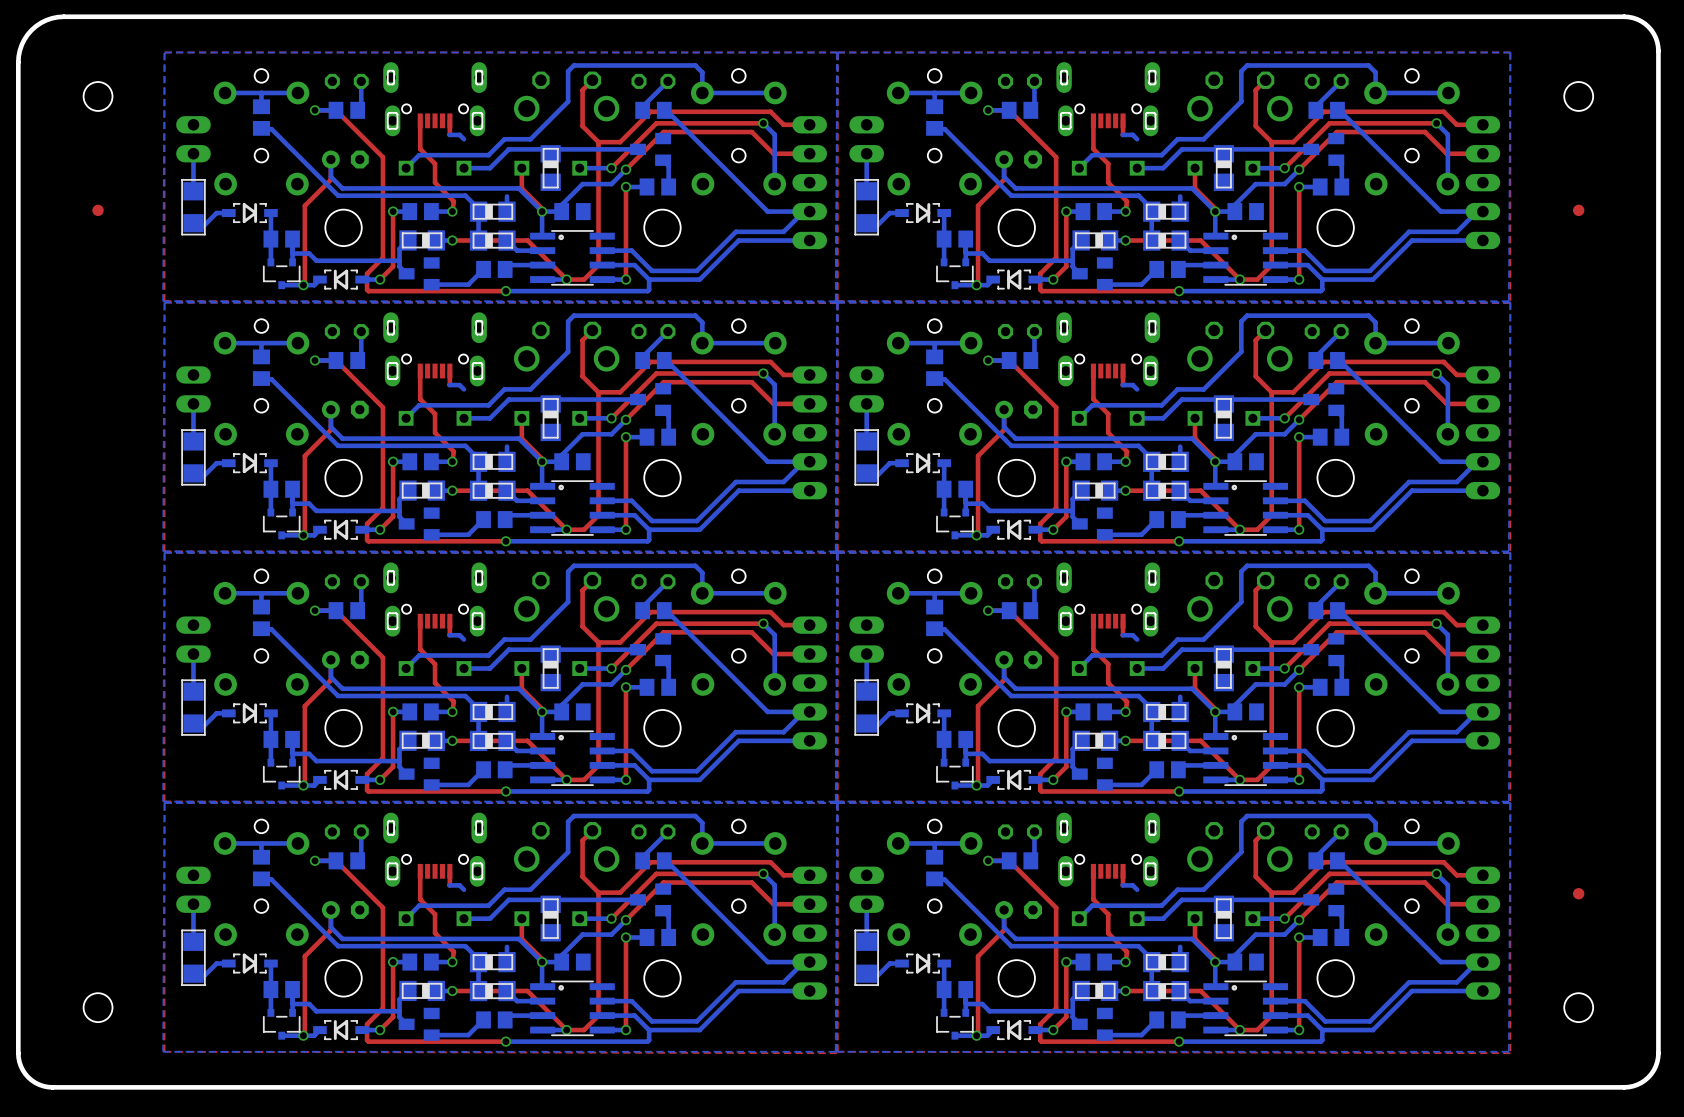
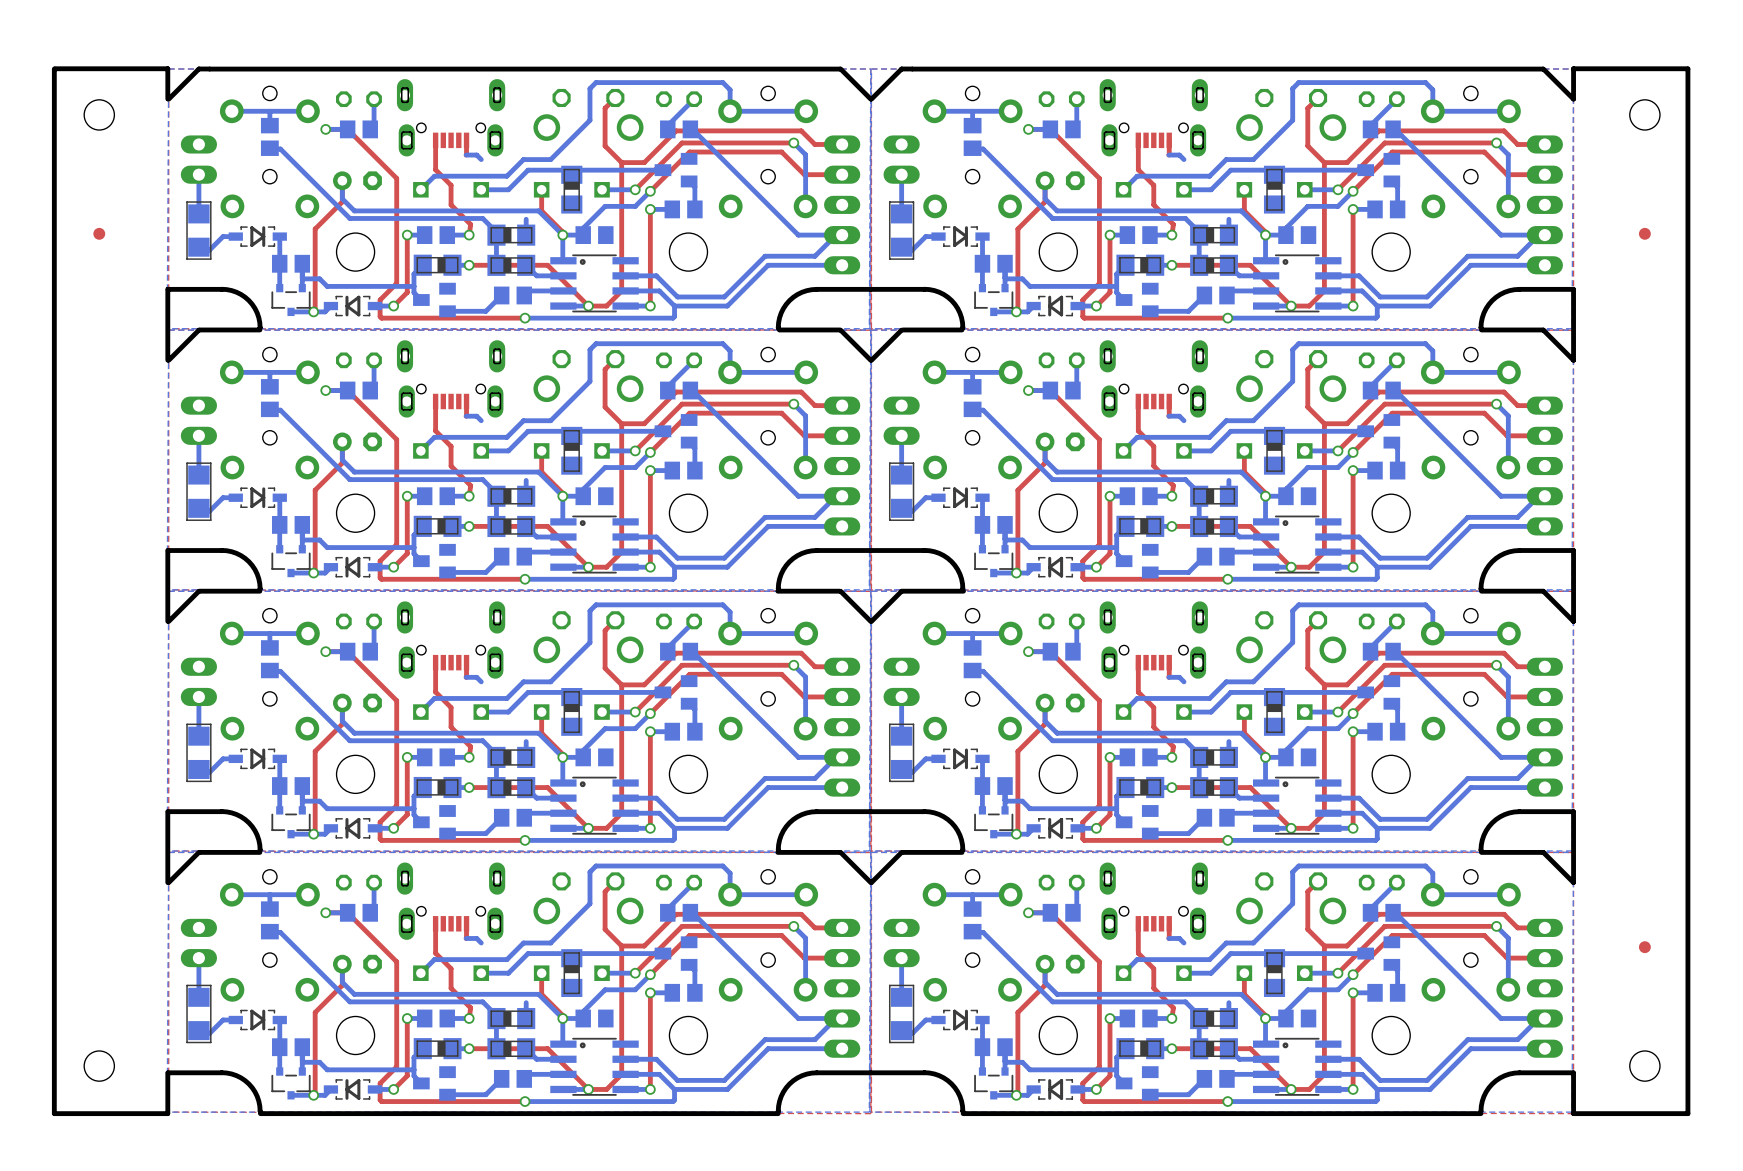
board edge: (1624, 16) (63, 16) (52, 18) (41, 22) (31, 30) (24, 39) (19, 50) (18, 62) (18, 1053) (22, 1070) (35, 1082) (52, 1087) (1624, 1087) (1641, 1082) (1653, 1070) (1658, 1053) (1658, 50) (1655, 37) (1648, 26) (1637, 19) (1624, 16) -> none
board edge: none -> (54, 69) (54, 1113)
board edge: none -> (54, 68) (167, 68) (167, 98)
board edge: none -> (209, 68) (198, 68) (168, 99)
board edge: none -> (840, 69) (209, 69)
board edge: none -> (840, 68) (870, 99)
board edge: none -> (912, 68) (901, 68) (871, 99)
board edge: none -> (1542, 69) (912, 69)
board edge: none -> (1543, 68) (1573, 99)
board edge: none -> (1687, 68) (1573, 68) (1573, 98)
board edge: none -> (1687, 69) (1687, 1113) (1573, 1113) (1573, 1072)
board edge: none -> (167, 289) (167, 360)
board edge: none -> (221, 289) (236, 292) (248, 300) (257, 312) (260, 328)
board edge: none -> (221, 289) (168, 289)
board edge: none -> (816, 289) (801, 292) (789, 300) (781, 313) (778, 327)
board edge: none -> (870, 289) (816, 289)
board edge: none -> (924, 289) (939, 292) (951, 300) (959, 312) (962, 328)
board edge: none -> (924, 289) (870, 289)
board edge: none -> (1519, 289) (1504, 292) (1492, 300) (1483, 313) (1480, 327)
board edge: none -> (1573, 289) (1573, 360)
board edge: none -> (1573, 289) (1519, 289)
board edge: none -> (198, 330) (168, 360)
board edge: none -> (259, 329) (199, 329)
board edge: none -> (839, 329) (779, 329)
board edge: none -> (840, 330) (870, 360)
board edge: none -> (901, 330) (871, 360)
board edge: none -> (962, 329) (903, 329)
board edge: none -> (1543, 329) (1481, 329)
board edge: none -> (1543, 330) (1573, 360)
board edge: none -> (167, 550) (167, 621)
board edge: none -> (221, 550) (236, 553) (248, 561) (257, 574) (260, 589)
board edge: none -> (221, 550) (168, 550)
board edge: none -> (816, 550) (801, 553) (789, 561) (781, 574) (778, 588)
board edge: none -> (870, 550) (816, 550)
board edge: none -> (924, 550) (939, 553) (951, 561) (959, 574) (962, 589)
board edge: none -> (924, 550) (870, 550)
board edge: none -> (1519, 550) (1504, 553) (1492, 561) (1483, 574) (1480, 588)
board edge: none -> (1573, 550) (1573, 621) (1543, 591) (1481, 591)
board edge: none -> (1573, 550) (1519, 550)
board edge: none -> (198, 591) (168, 621)
board edge: none -> (259, 591) (199, 591)
board edge: none -> (839, 591) (777, 591)
board edge: none -> (840, 591) (870, 621)
board edge: none -> (963, 591) (901, 591) (871, 621)
board edge: none -> (167, 811) (167, 882)
board edge: none -> (221, 811) (236, 814) (248, 822) (257, 835) (260, 850)
board edge: none -> (221, 811) (168, 811)
board edge: none -> (816, 811) (801, 814) (789, 822) (781, 835) (778, 850)
board edge: none -> (870, 811) (816, 811)
board edge: none -> (924, 811) (939, 814) (951, 822) (959, 835) (962, 850)
board edge: none -> (924, 811) (870, 811)
board edge: none -> (1519, 811) (1504, 814) (1492, 822) (1483, 835) (1480, 850)
board edge: none -> (1573, 811) (1573, 882) (1543, 852) (1481, 852)
board edge: none -> (1573, 811) (1519, 811)
board edge: none -> (198, 852) (168, 882)
board edge: none -> (259, 852) (199, 852)
board edge: none -> (839, 852) (777, 852)
board edge: none -> (840, 852) (870, 882)
board edge: none -> (901, 852) (871, 882)
board edge: none -> (962, 852) (903, 852)
board edge: none -> (221, 1072) (236, 1075) (248, 1083) (257, 1096) (260, 1111)
board edge: none -> (924, 1072) (939, 1075) (951, 1083) (959, 1096) (962, 1111)
board edge: none -> (167, 1072) (167, 1113) (54, 1113)
board edge: none -> (221, 1072) (168, 1072)
board edge: none -> (816, 1072) (801, 1075) (789, 1084) (781, 1096) (778, 1111)
board edge: none -> (870, 1072) (816, 1072)
board edge: none -> (924, 1072) (870, 1072)
board edge: none -> (1519, 1072) (1504, 1075) (1492, 1084) (1483, 1096) (1480, 1111)
board edge: none -> (1573, 1072) (1519, 1072)
board edge: none -> (778, 1113) (260, 1113)
board edge: none -> (1480, 1113) (963, 1113)

